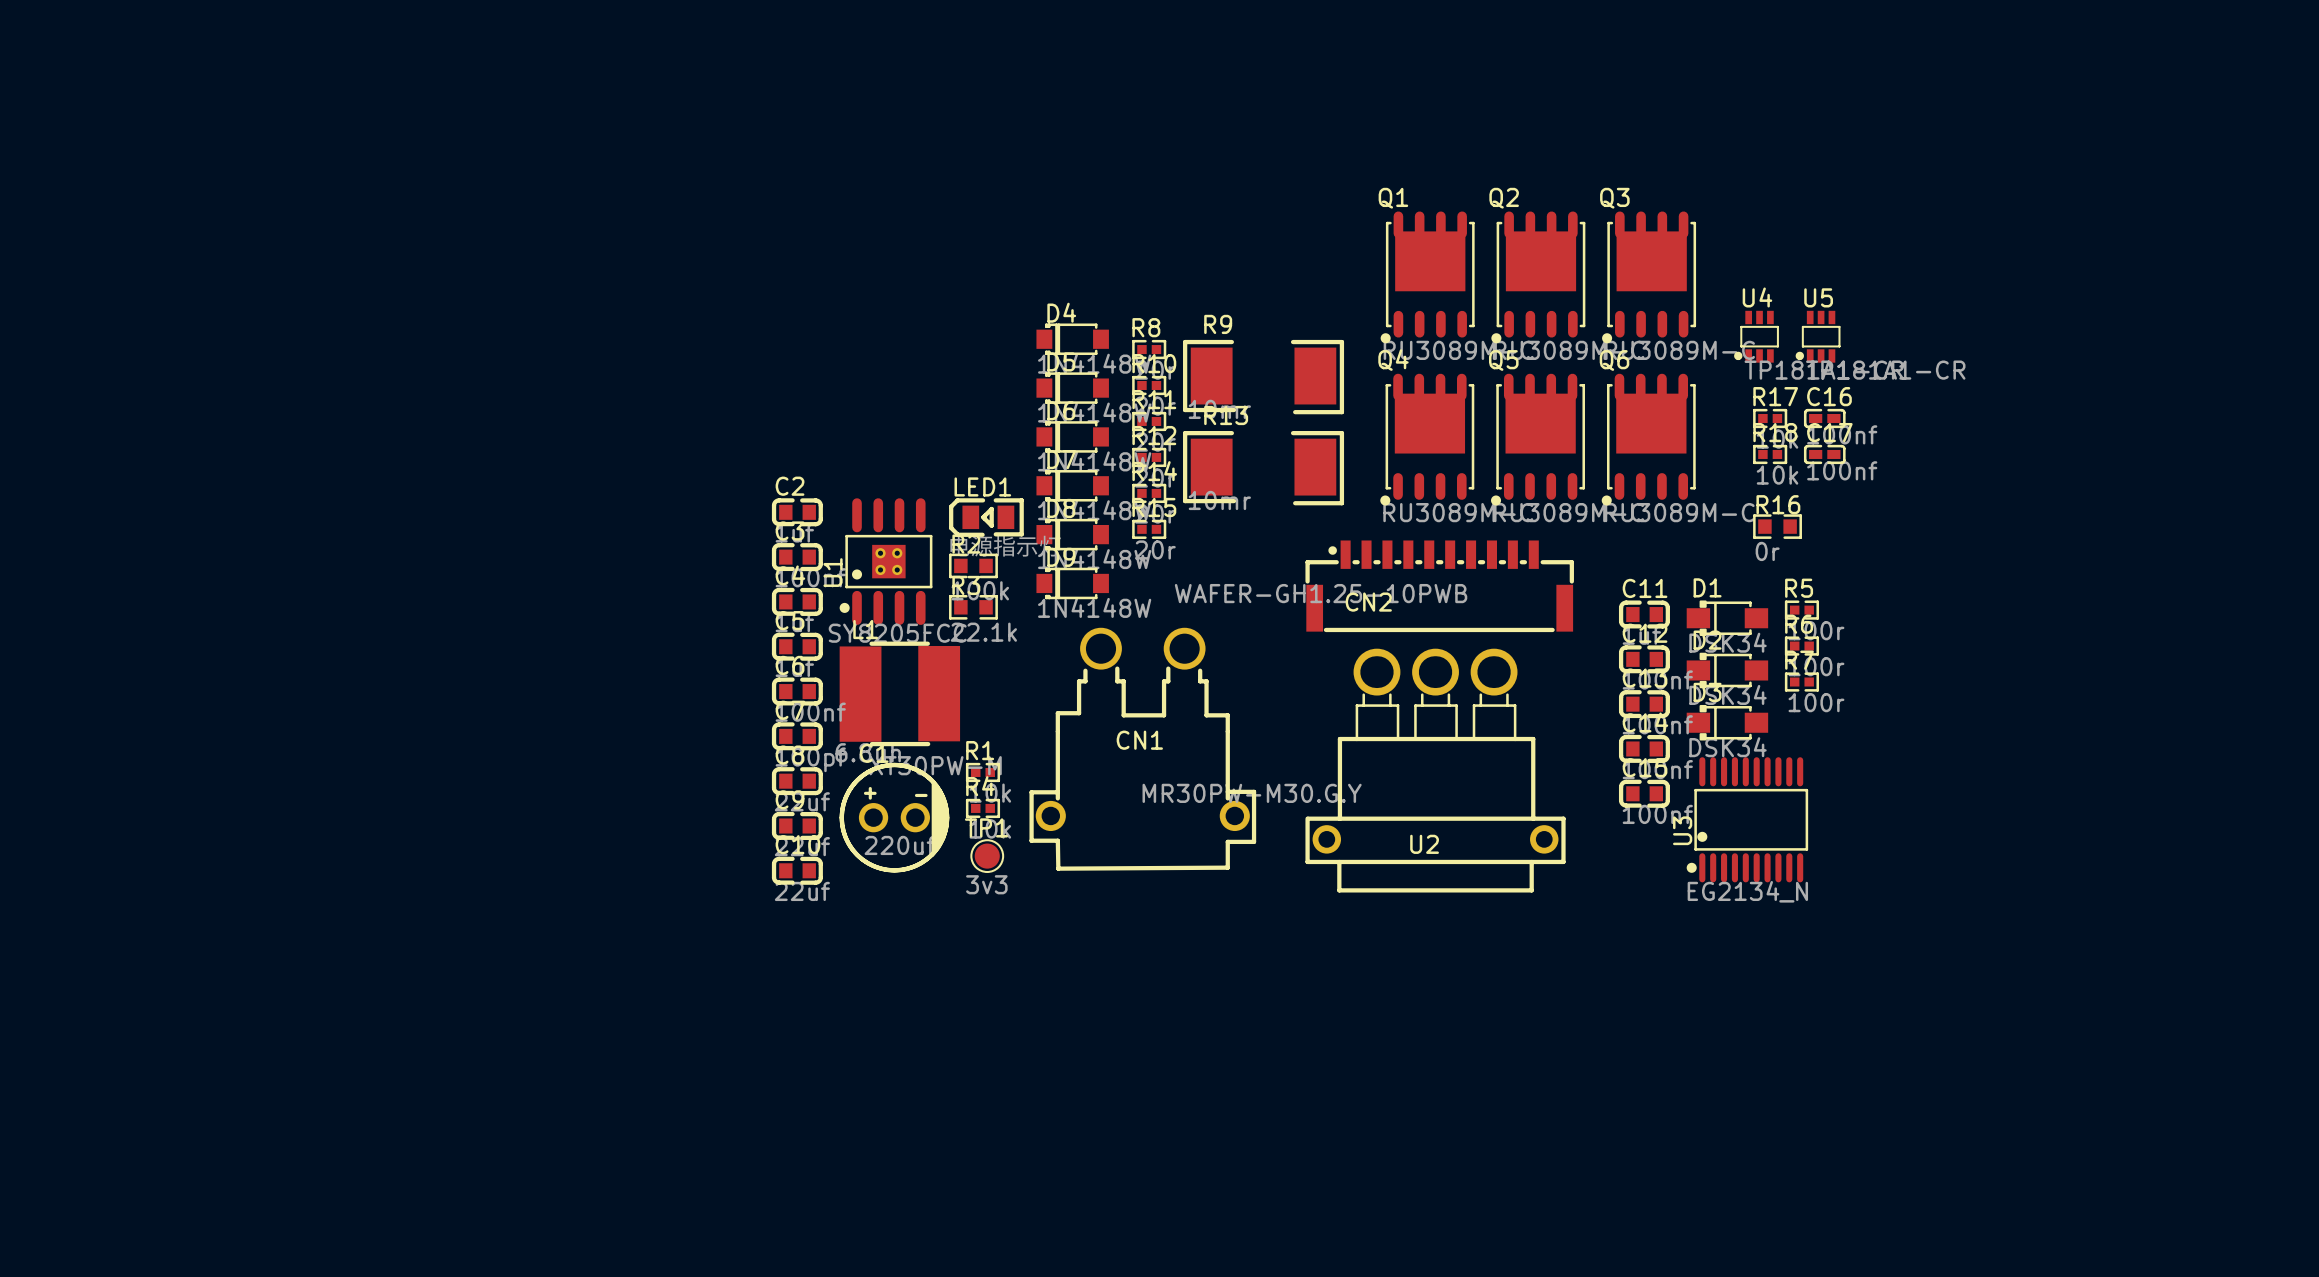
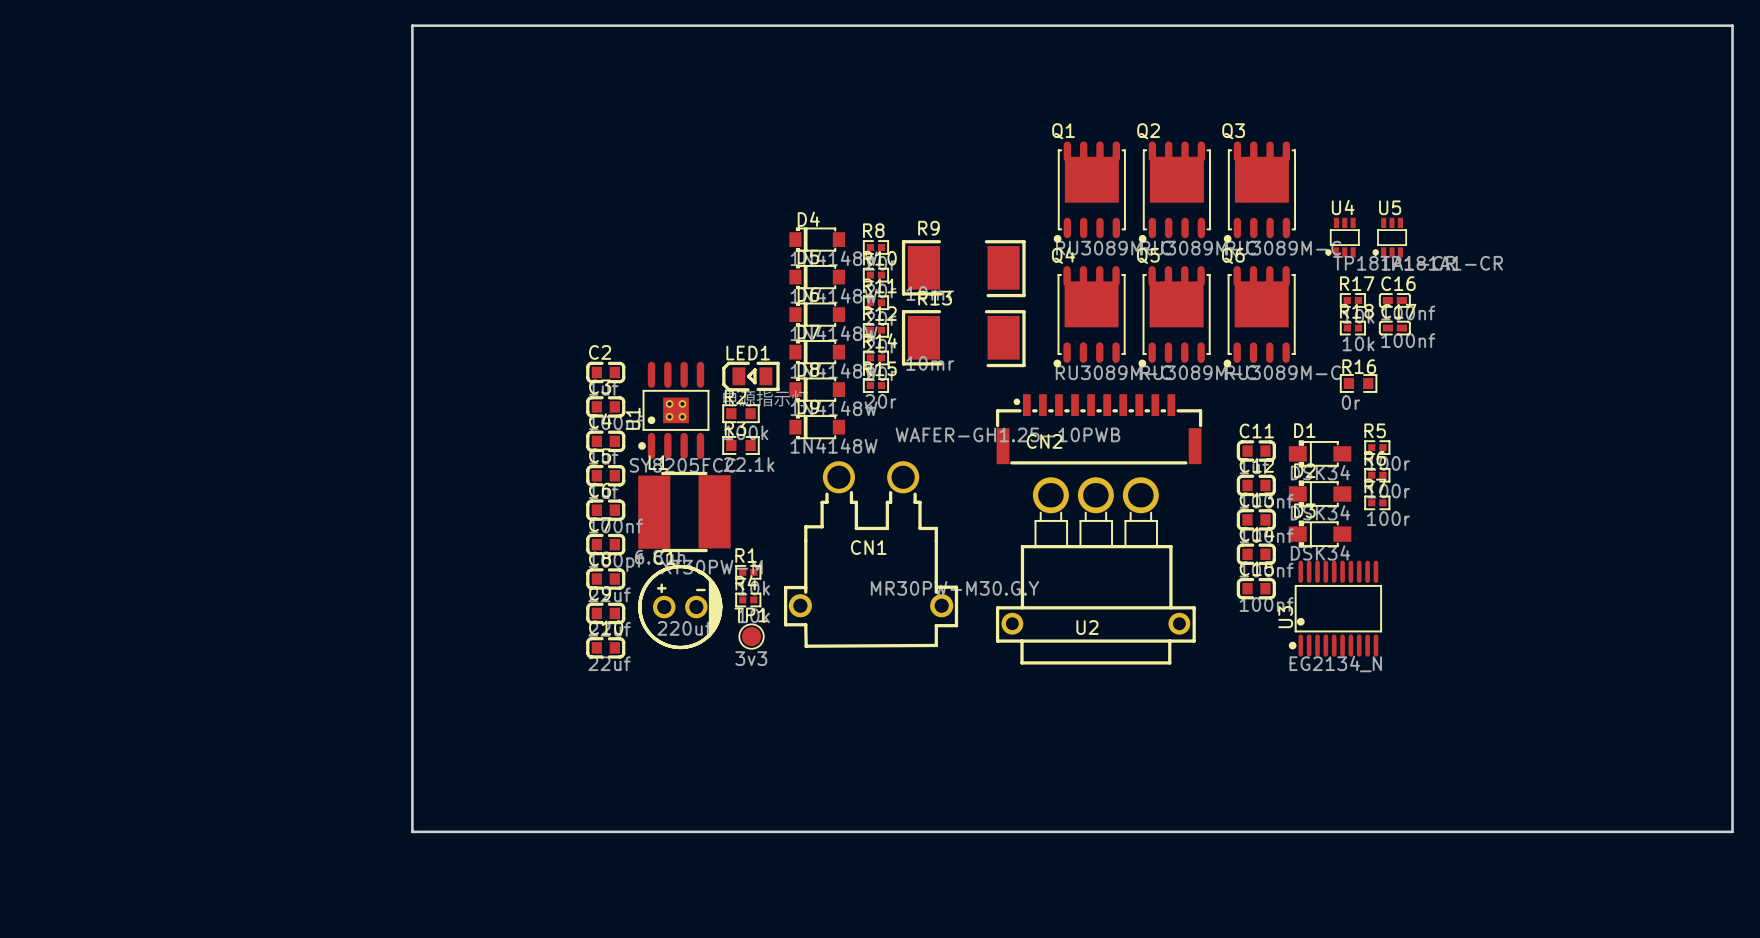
board edge: none -> (412, 25) (1732, 25) (1732, 831) (412, 831) (412, 25)

